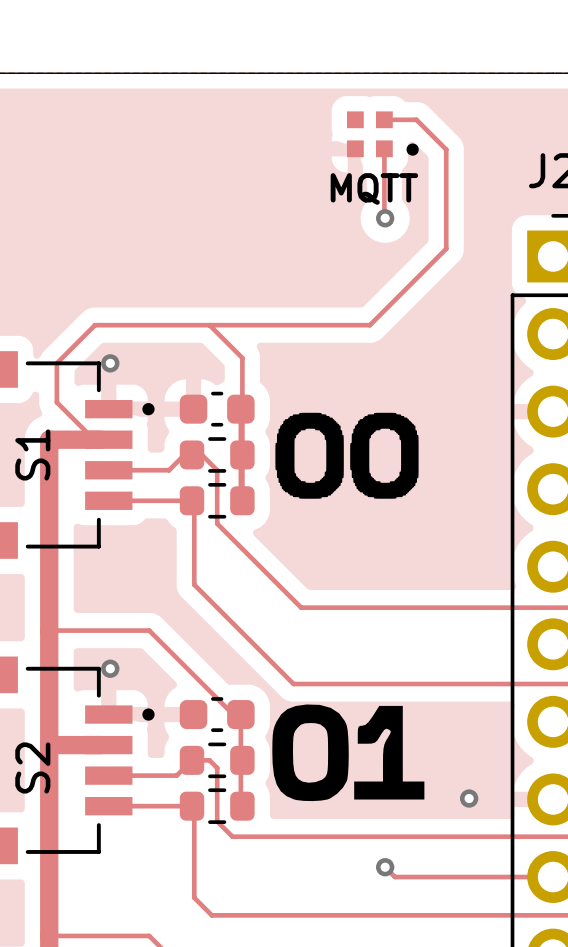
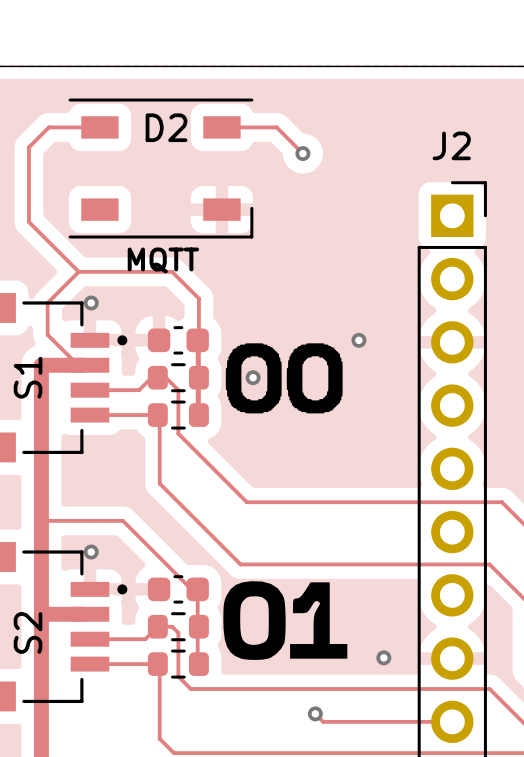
track: (384, 119) (416, 119) (446, 149) (446, 248) (369, 325) (209, 325) -> none
part: (382, 134) -> none
track: none -> (99, 127) (48, 127) (28, 147) (28, 222) (78, 271)
track: none -> (221, 127) (276, 127) (302, 153)
track: (384, 148) (385, 218) -> none
text position: MQTT (374, 188) -> MQTT (163, 260)
D2: none -> (160, 168)
via position: (385, 218) -> (302, 153)
via: none -> (358, 340)
via: none -> (253, 377)

